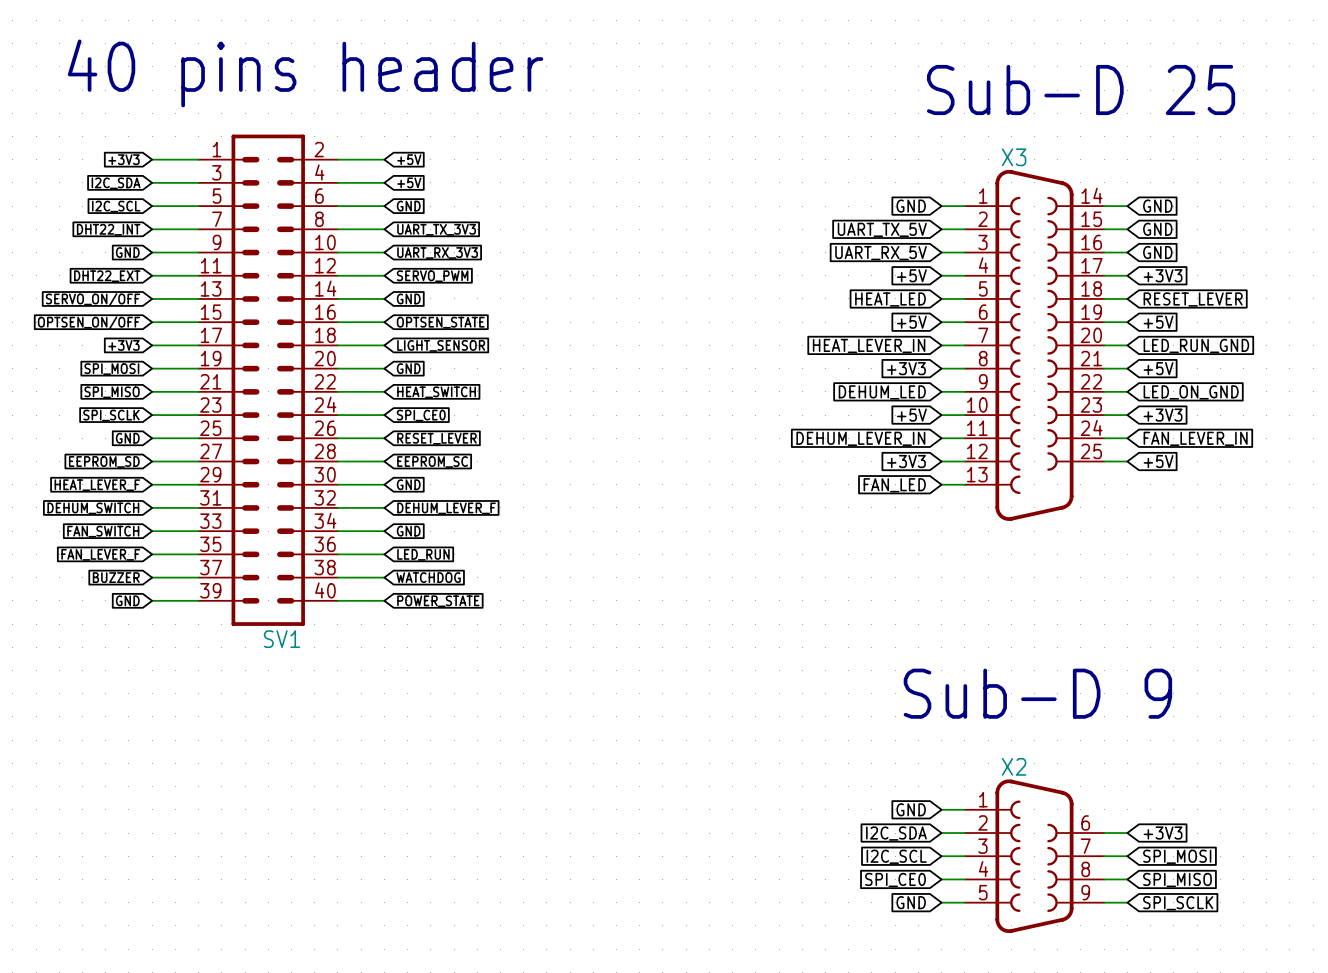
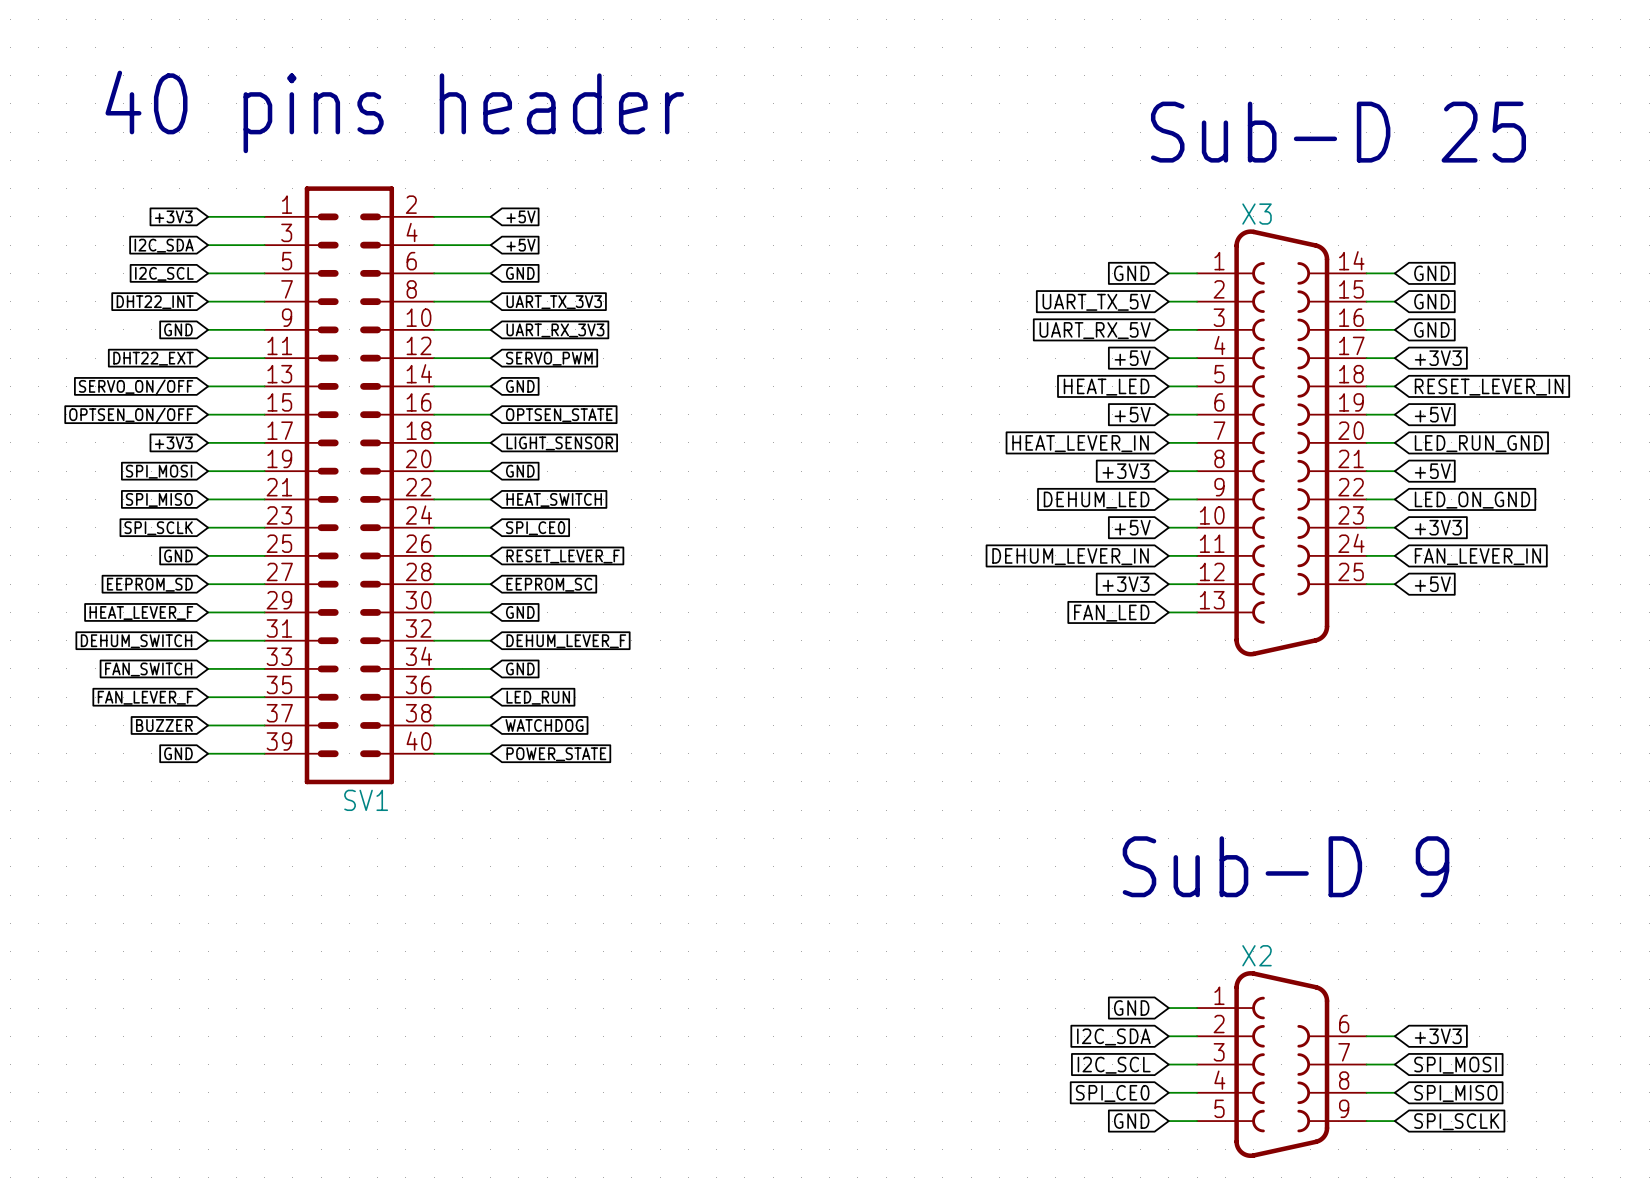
global label: RESET_LEVER (1193, 299) -> RESET_LEVER_IN (1489, 387)
global label: RESET_LEVER (436, 438) -> RESET_LEVER_F (563, 556)

